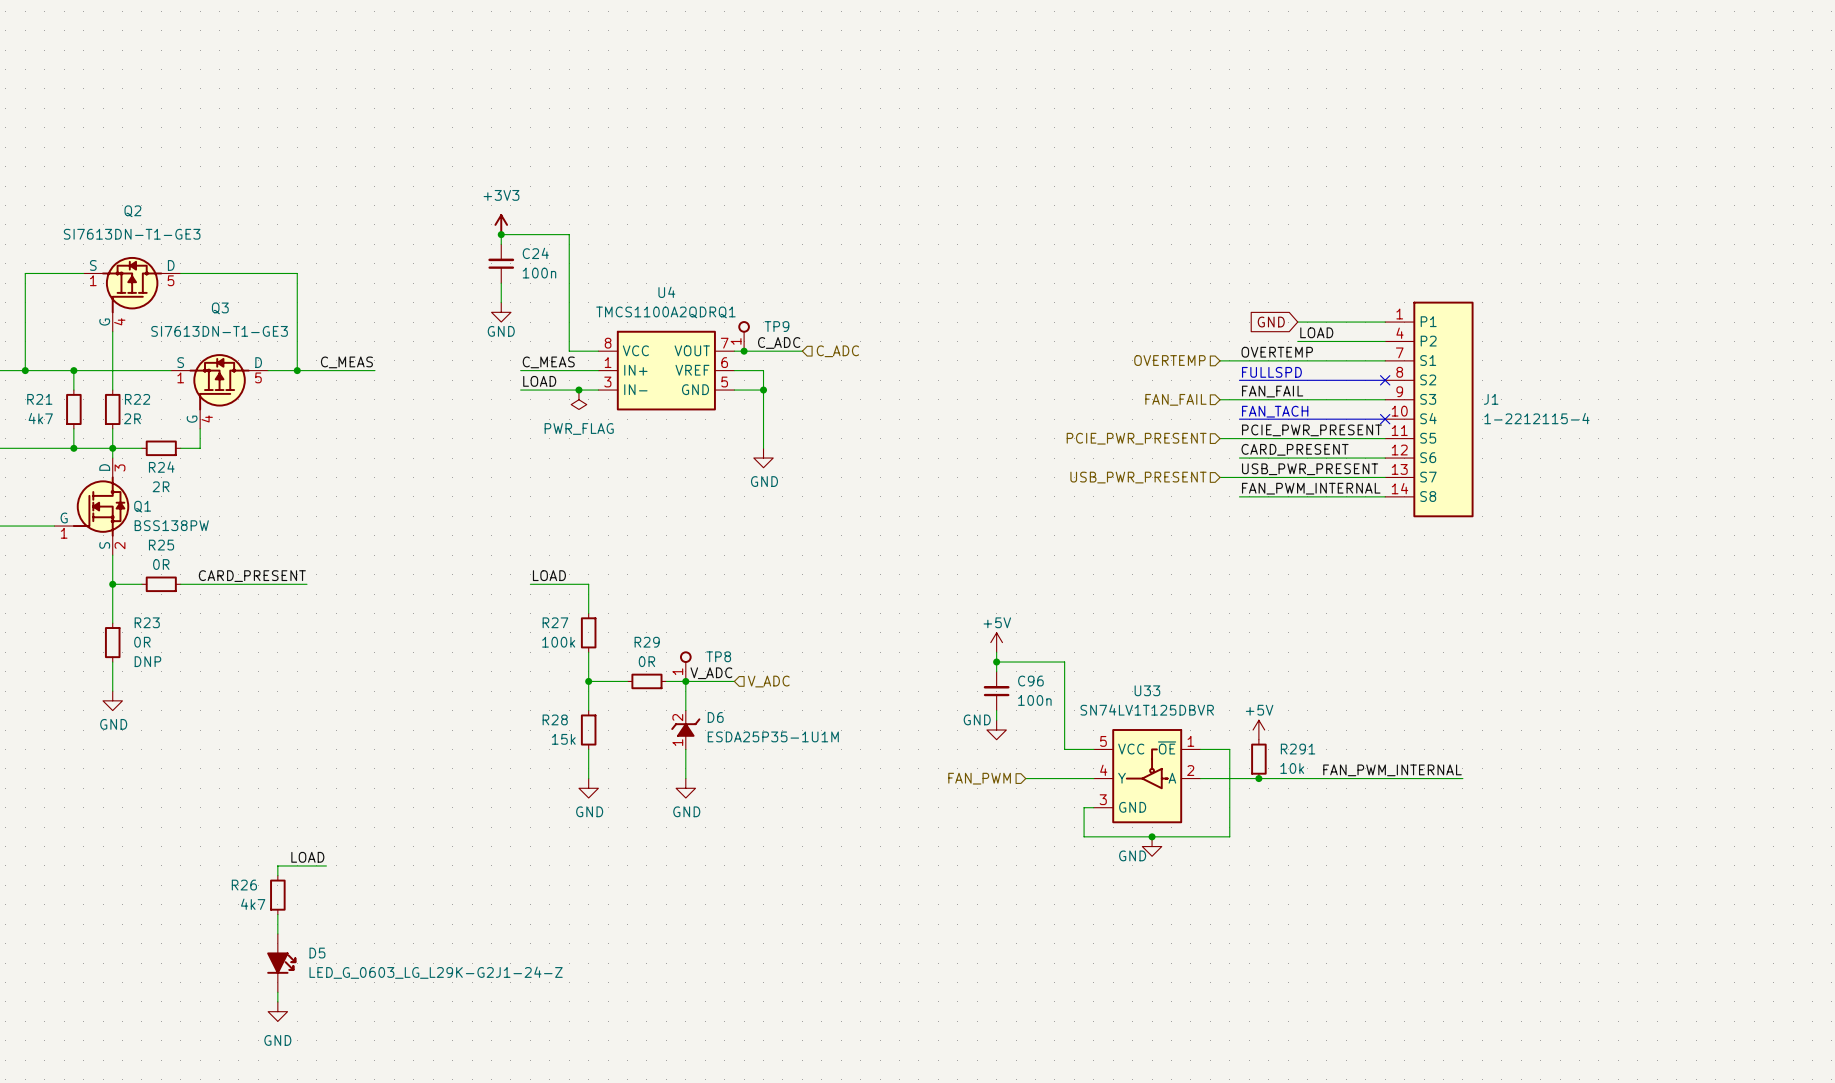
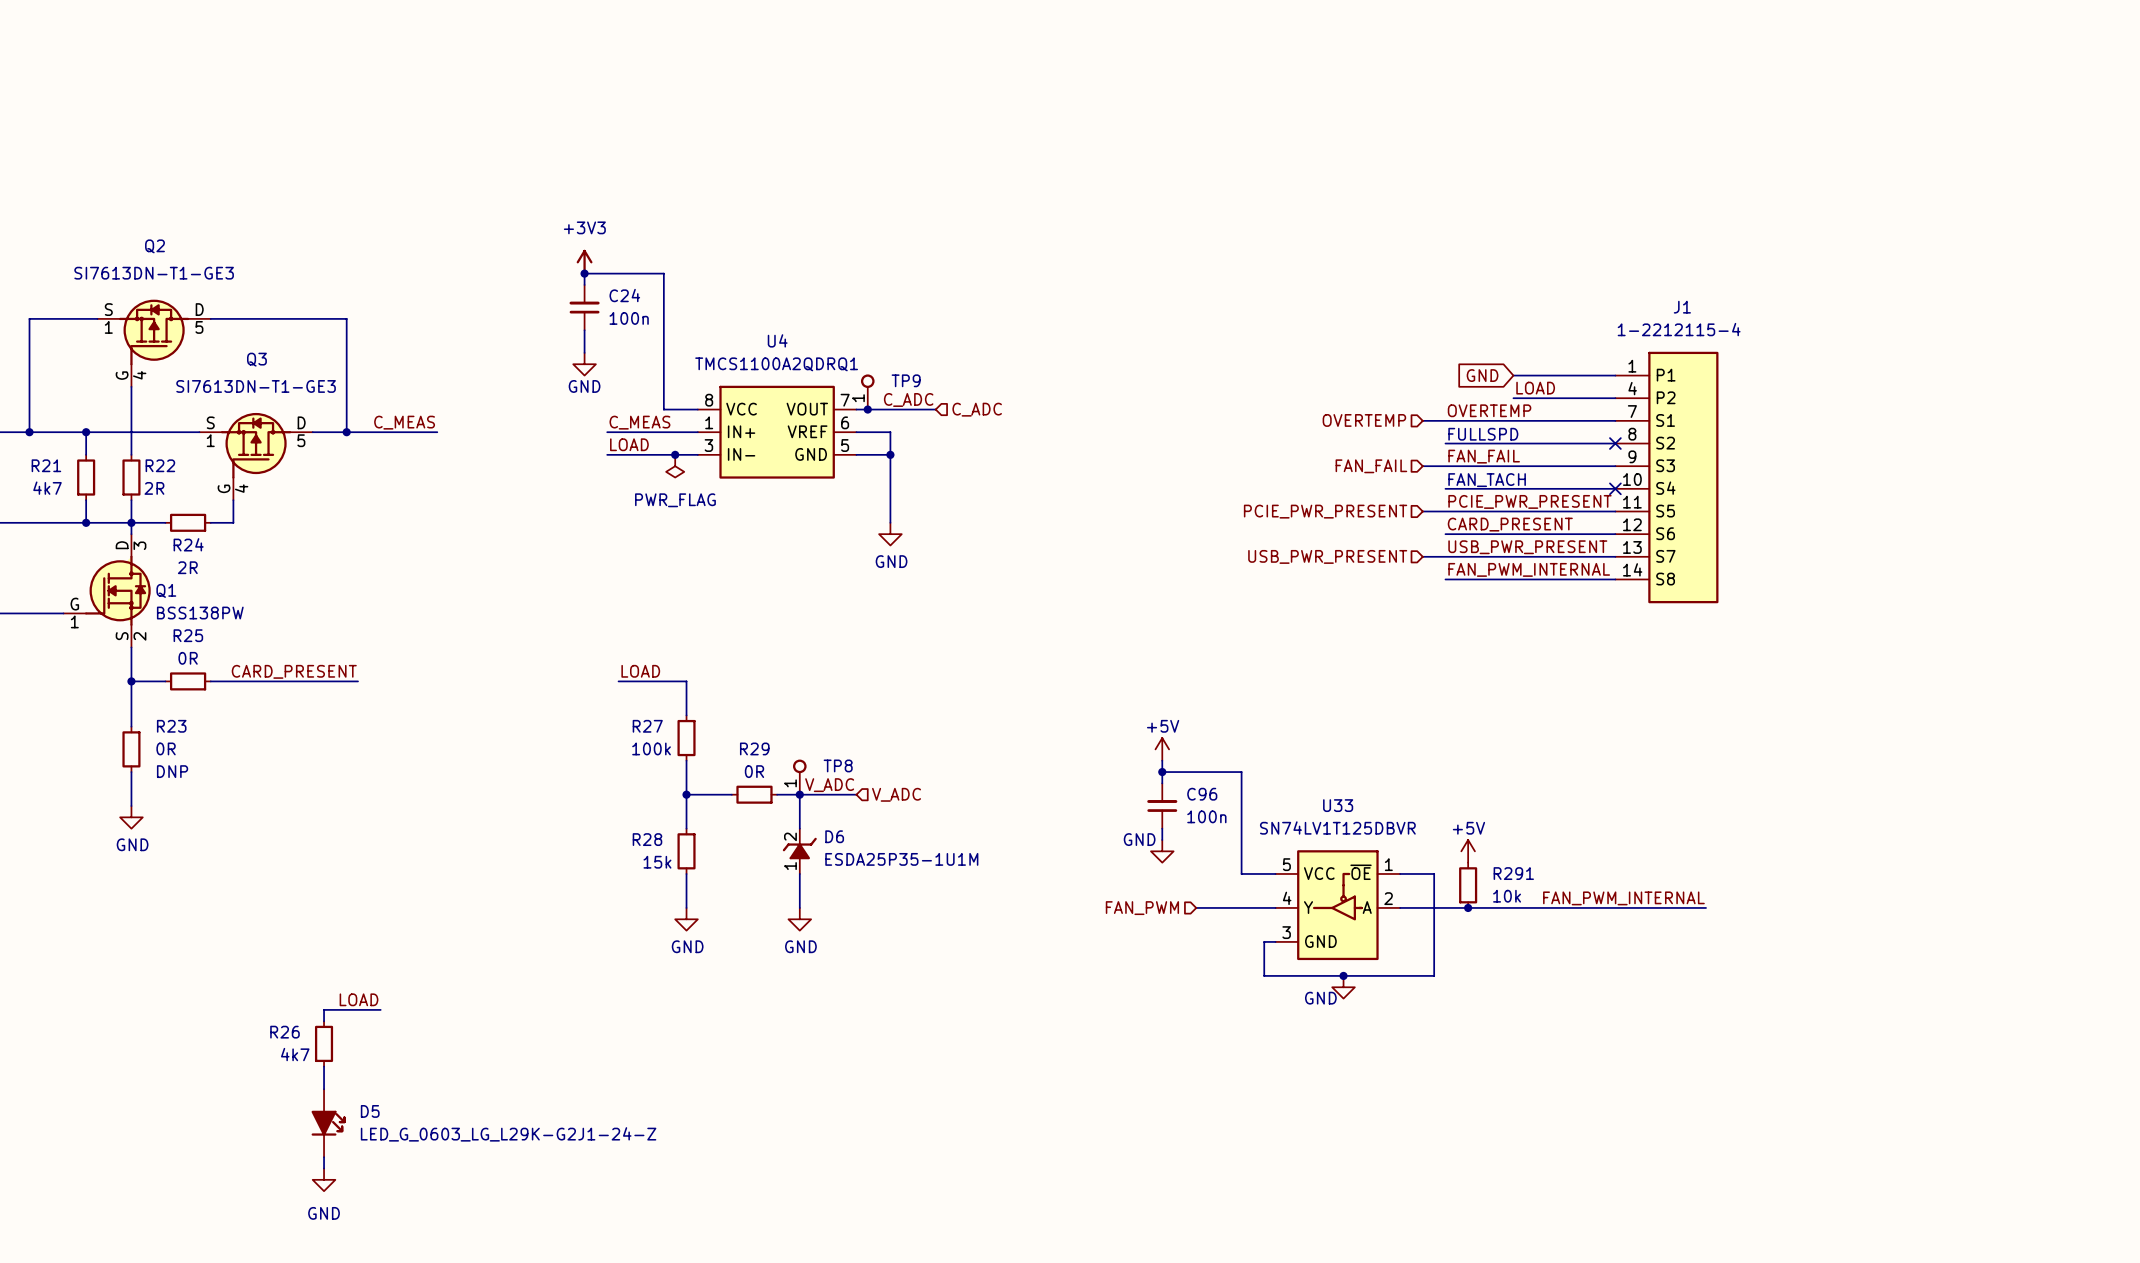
J1 name position: J1 (1491, 399) -> J1 (1682, 307)
J1 text position: 1-2212115-4 (1536, 418) -> 1-2212115-4 (1679, 329)

